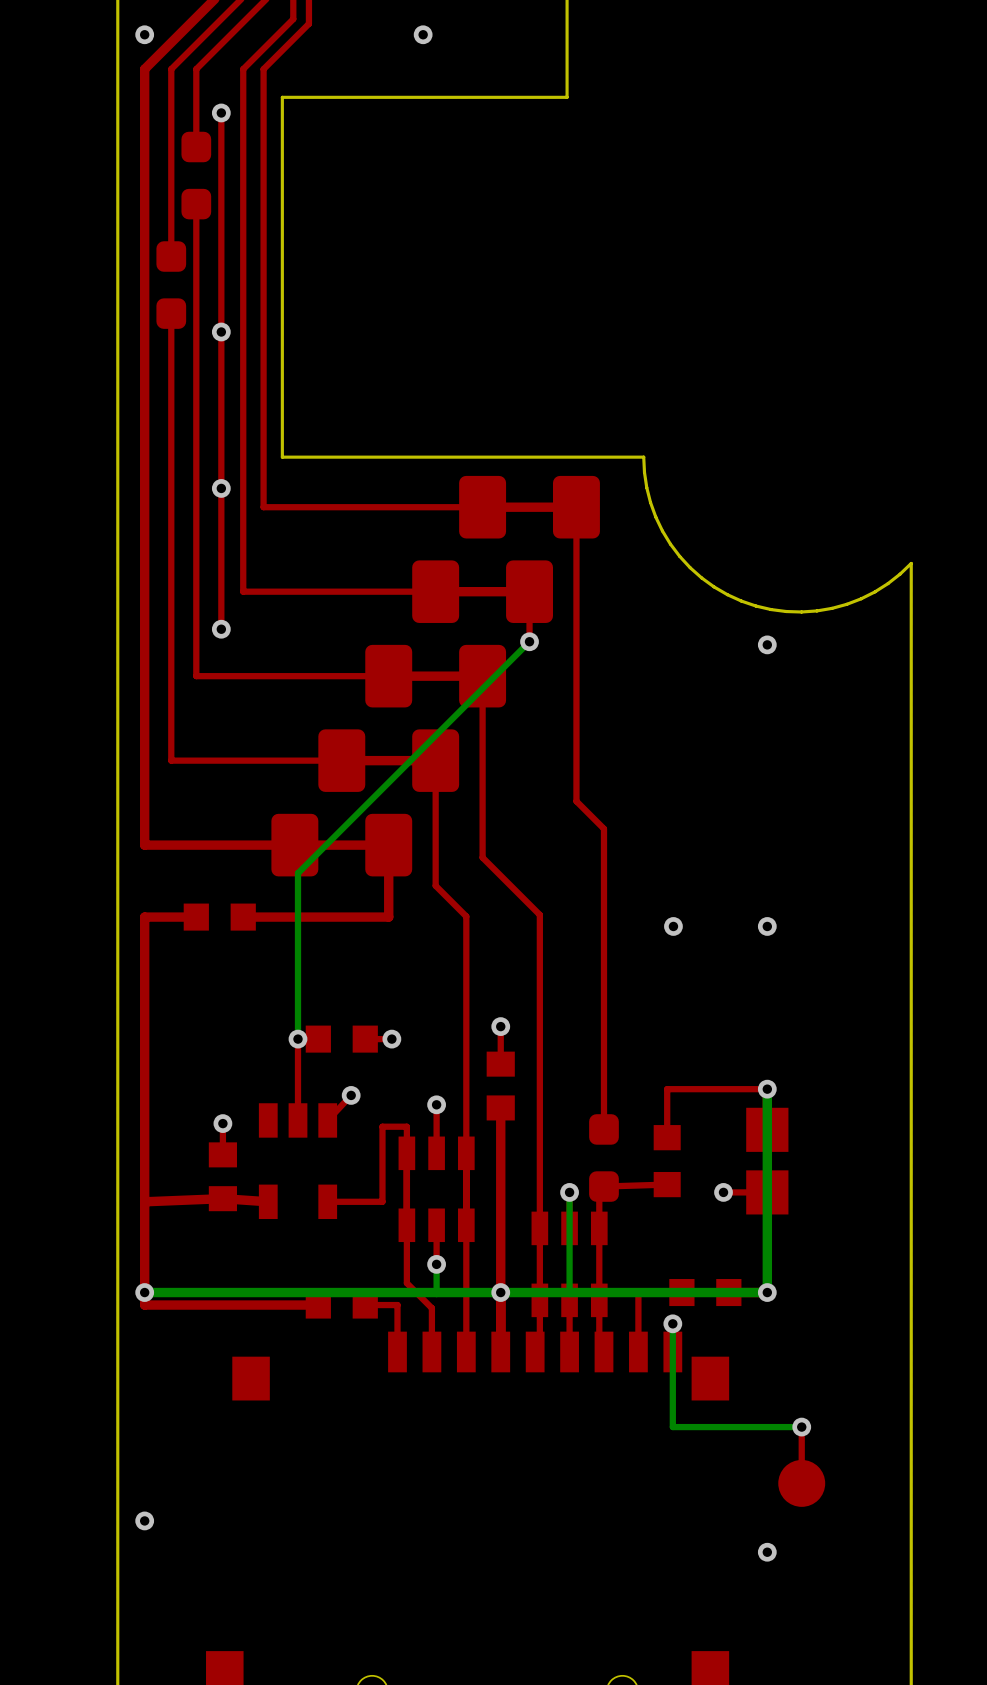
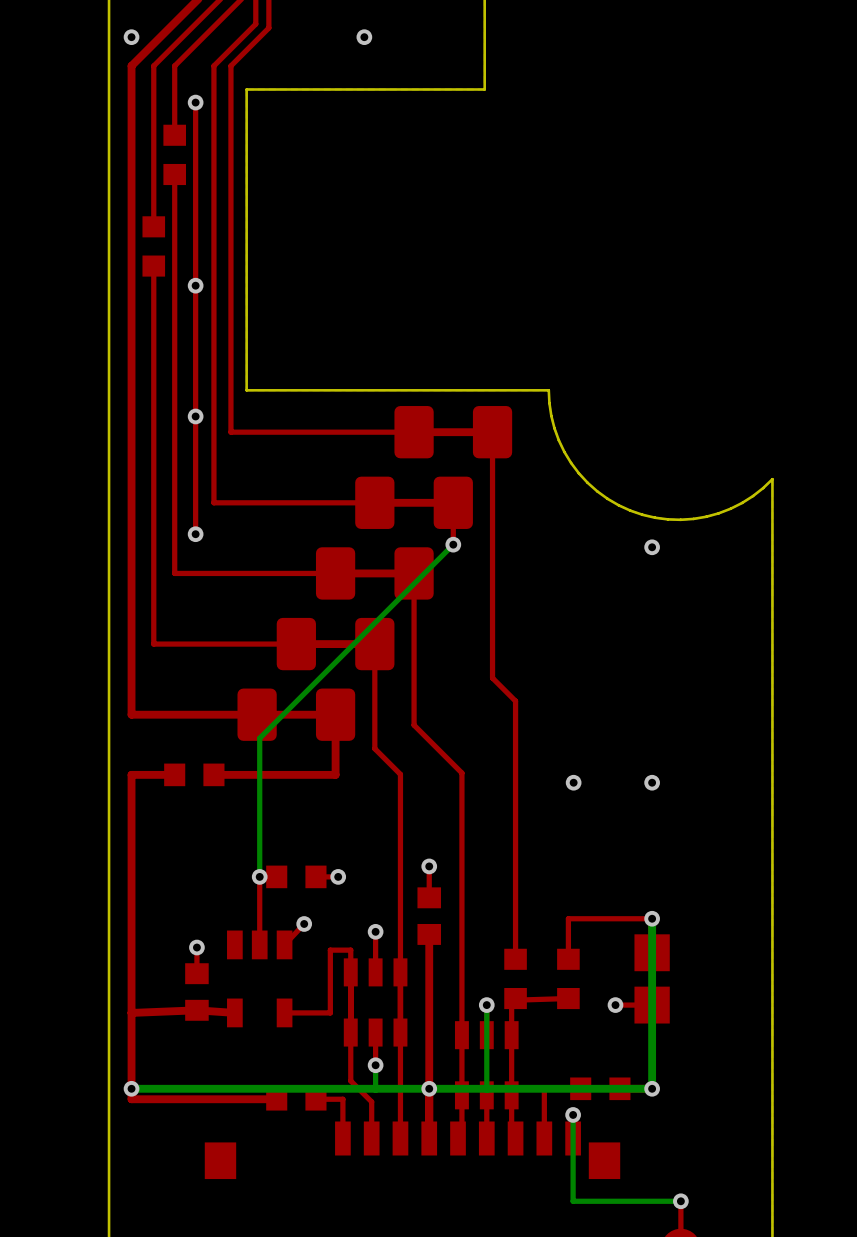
part footprint: [181, 131, 212, 220] -> [163, 124, 187, 186]
part footprint: [156, 241, 187, 329] -> [142, 216, 166, 277]
part footprint: [589, 1114, 619, 1202] -> [504, 948, 527, 1010]

